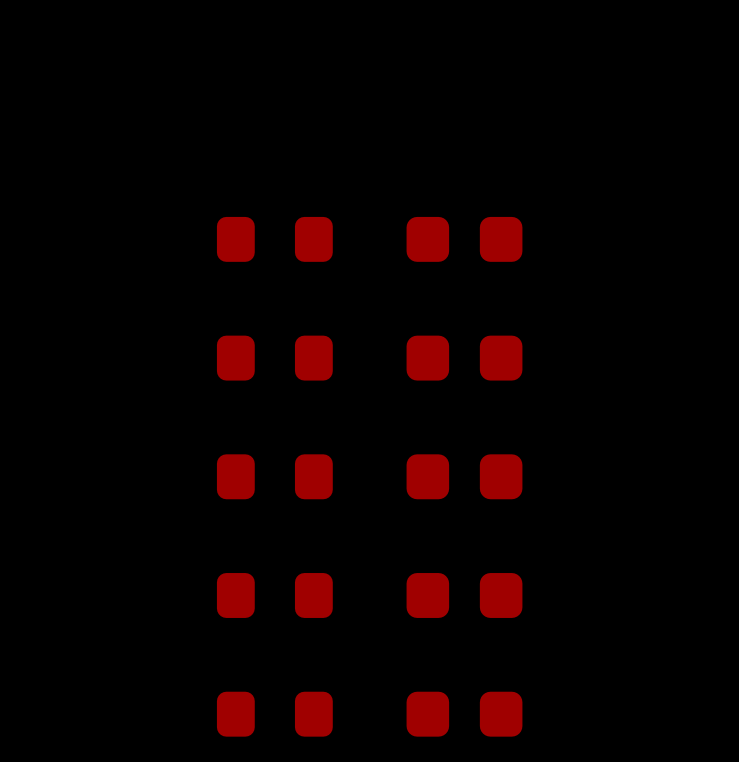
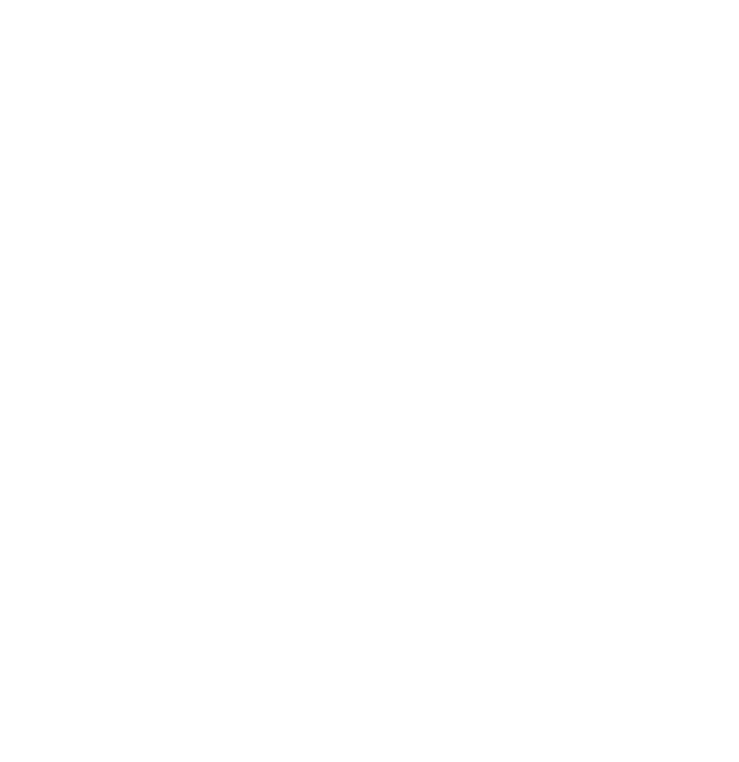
part: (274, 239) -> none
part: (464, 239) -> none
part: (274, 358) -> none
part: (464, 358) -> none
part: (274, 476) -> none
part: (464, 476) -> none
part: (274, 595) -> none
part: (464, 595) -> none
part: (274, 714) -> none
part: (464, 714) -> none

